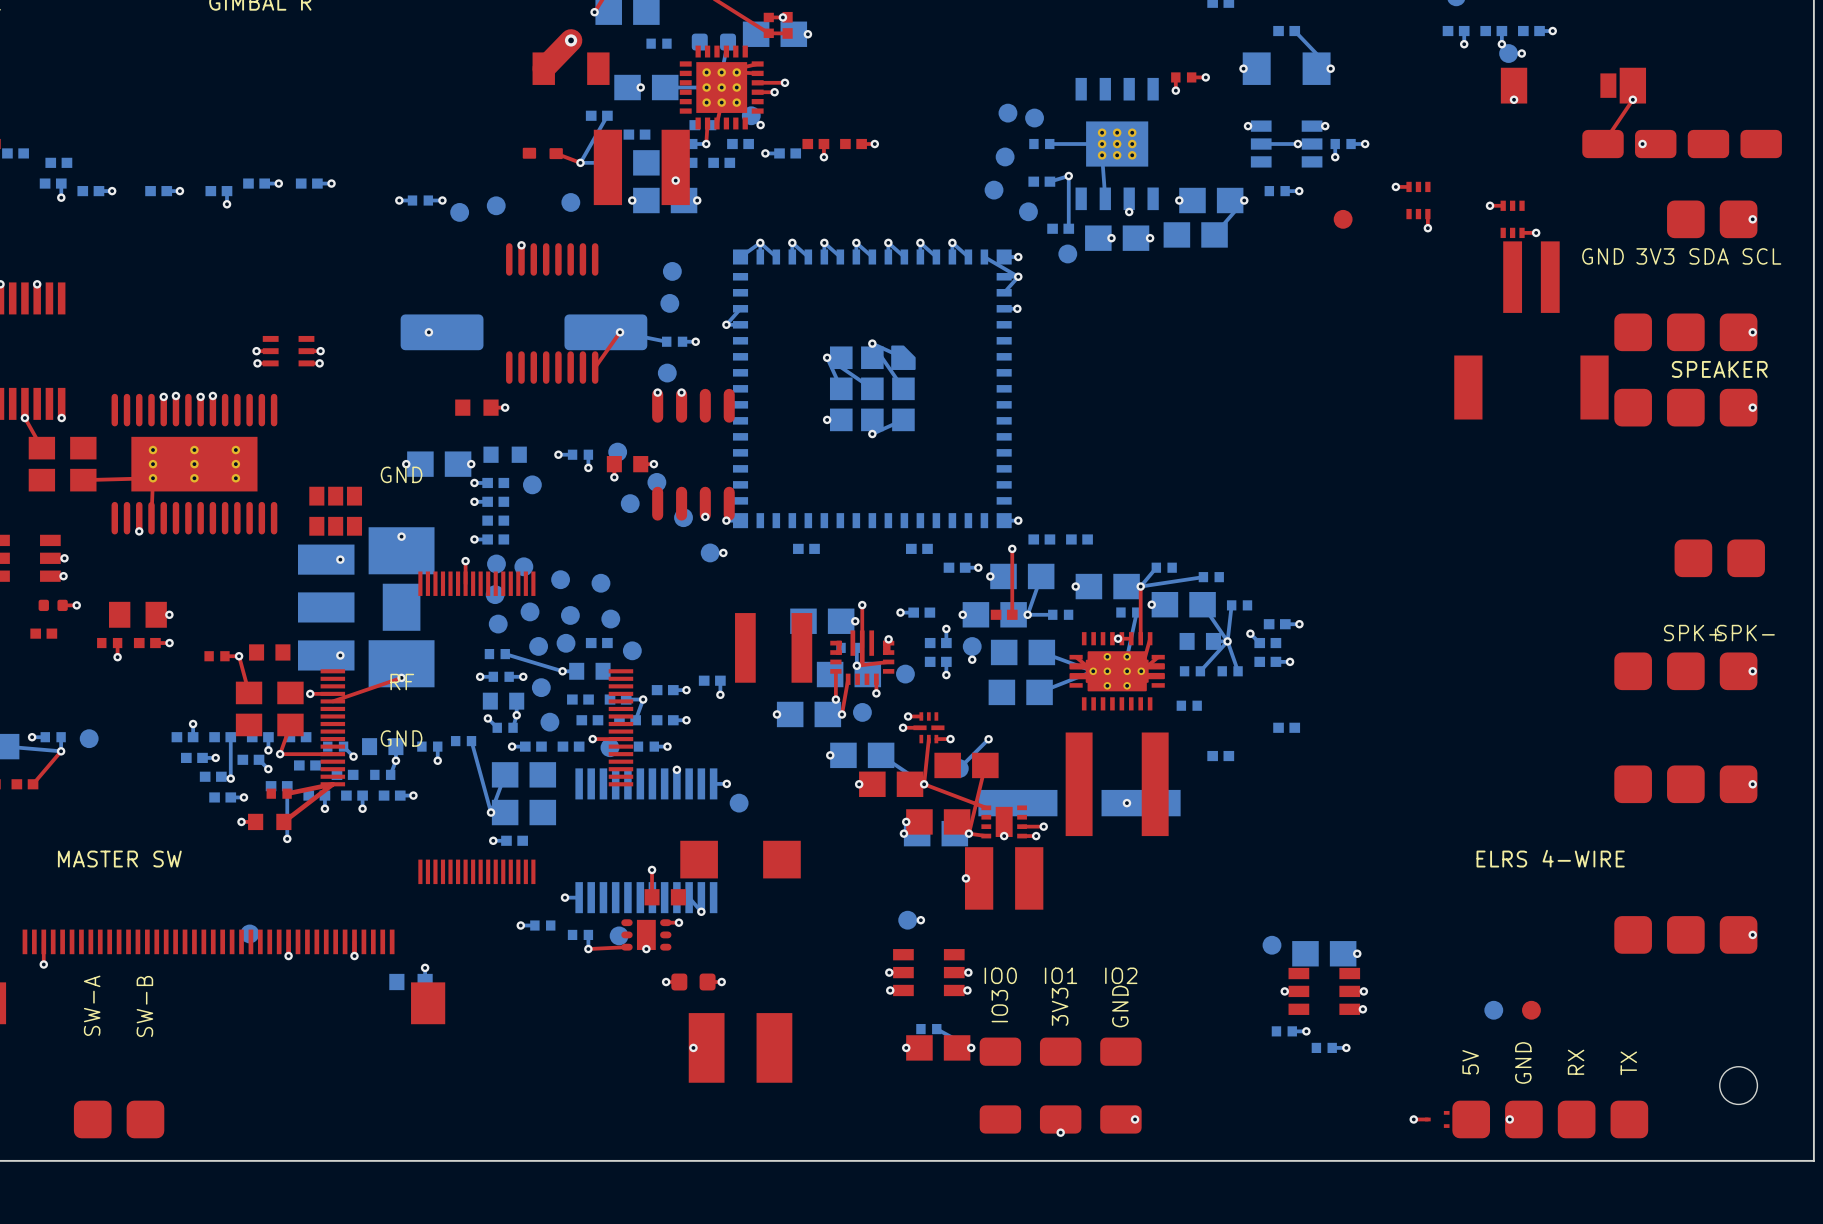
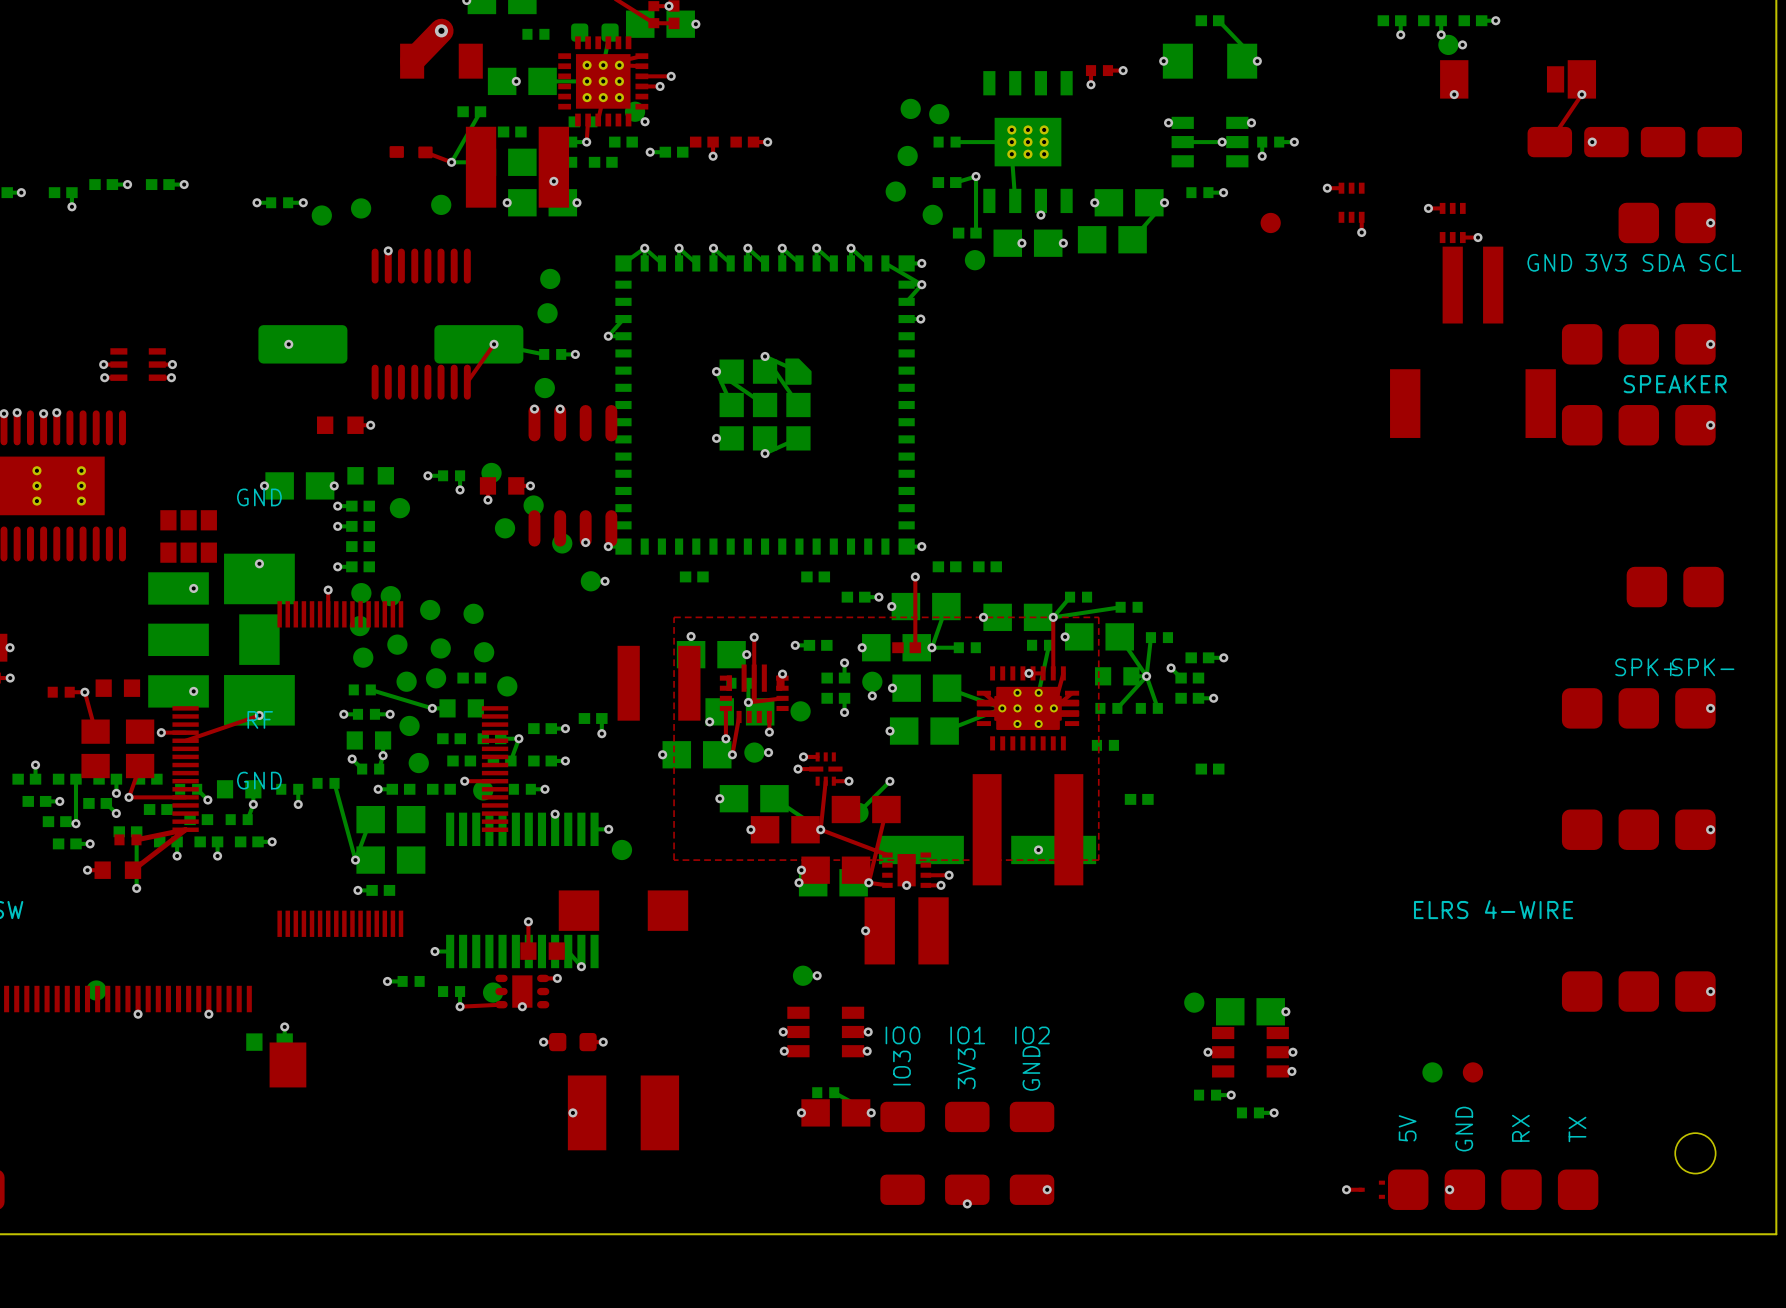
top zone outline: none -> (674, 617) (1098, 617) (1098, 860) (674, 860) (674, 617)
via: none -> (691, 636)
via: none -> (892, 688)
via: none -> (709, 721)
via: none -> (890, 731)
via: none -> (768, 752)

